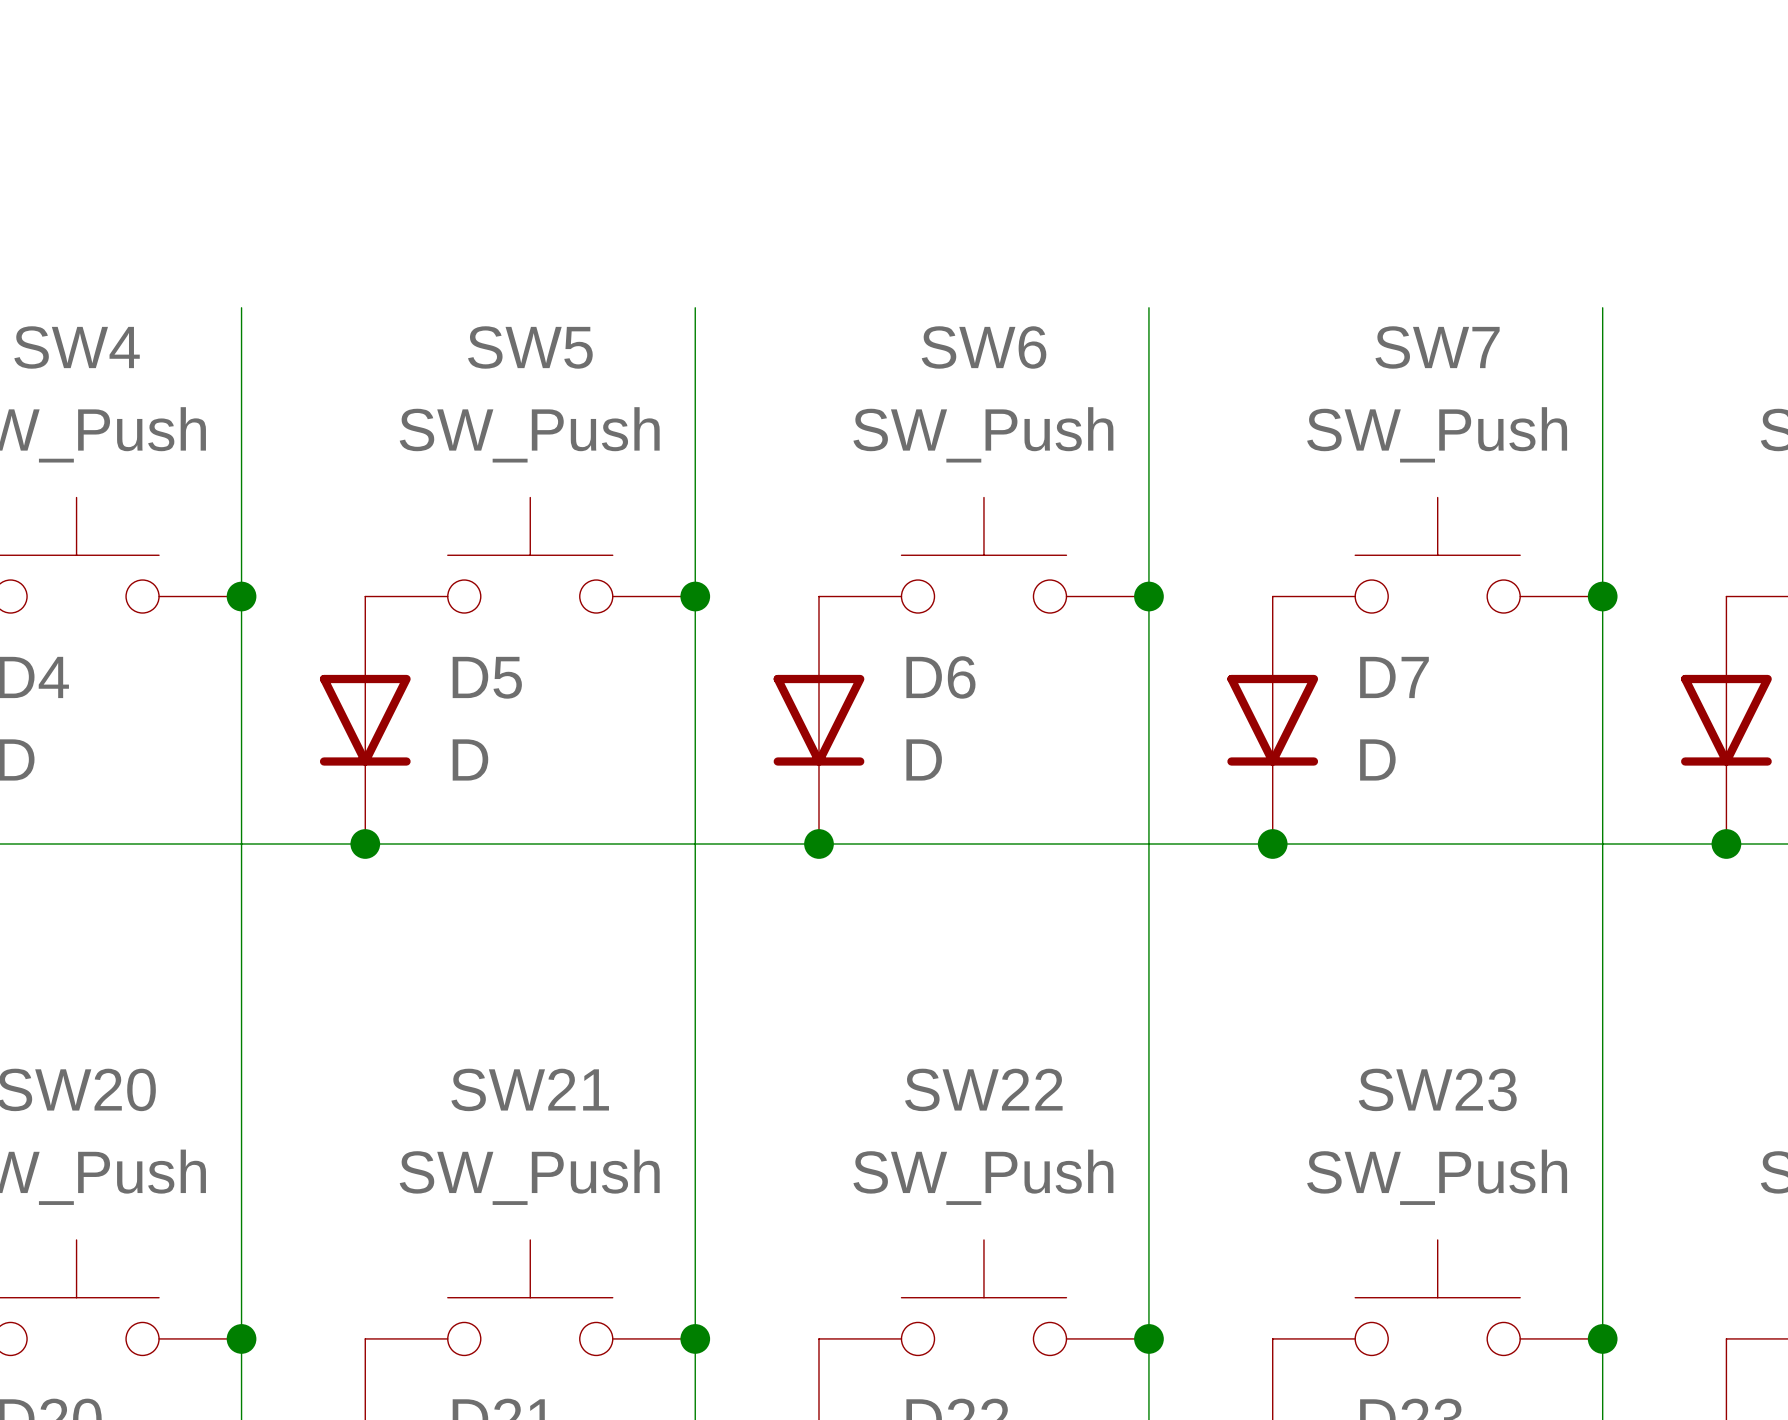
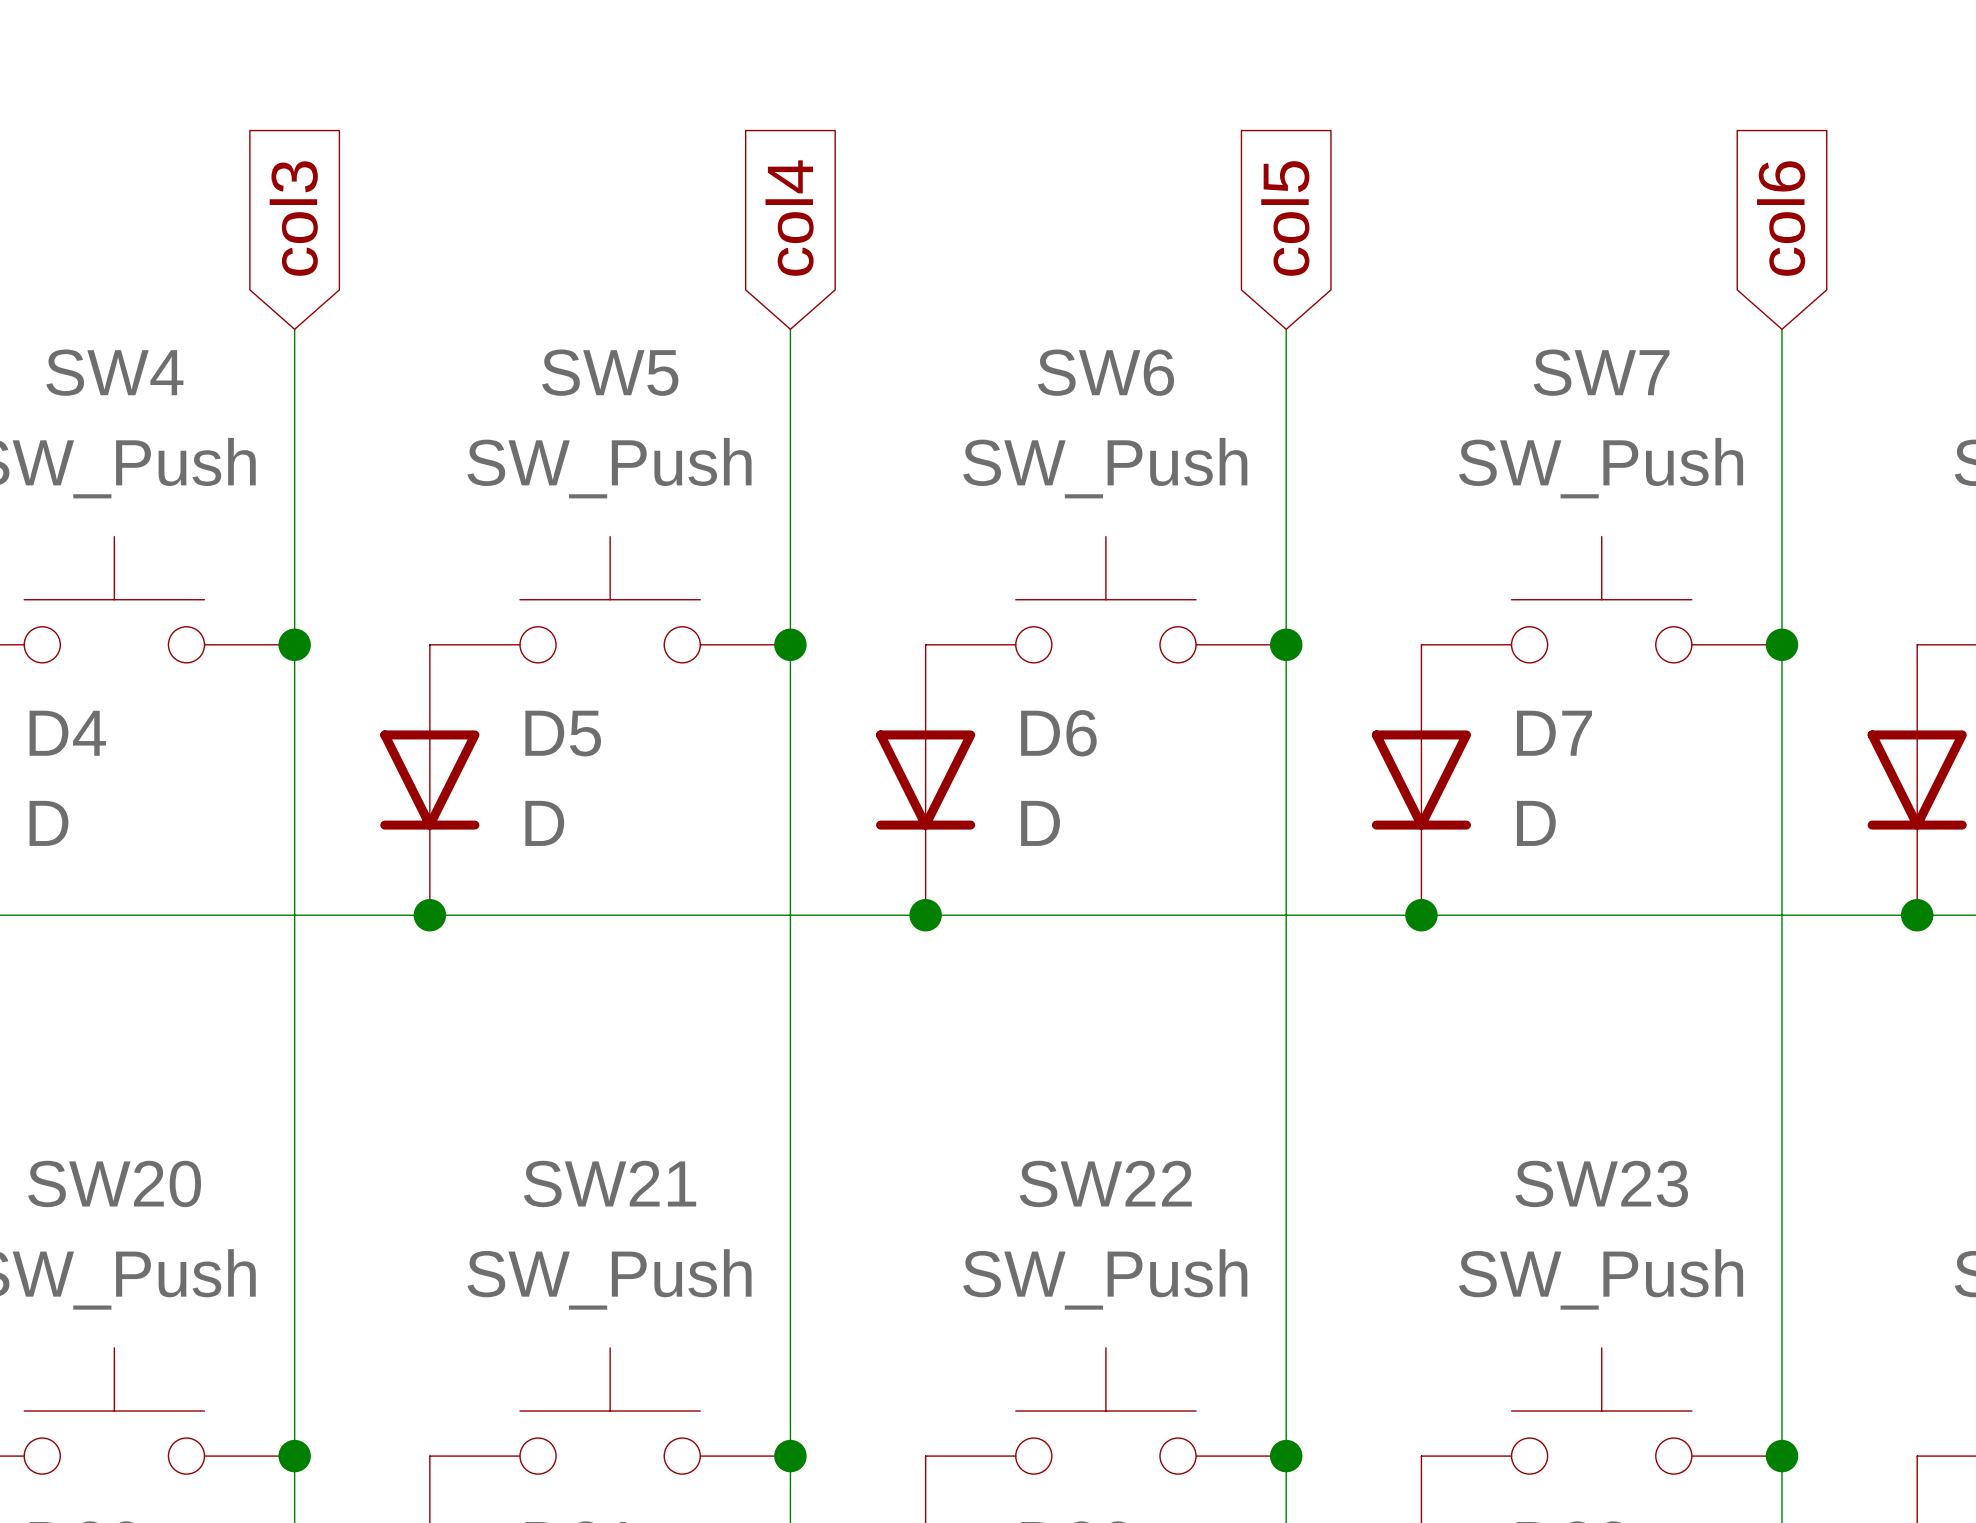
global label: none -> col3 (293, 218)
global label: none -> col4 (789, 218)
global label: none -> col5 (1285, 218)
global label: none -> col6 (1781, 218)

